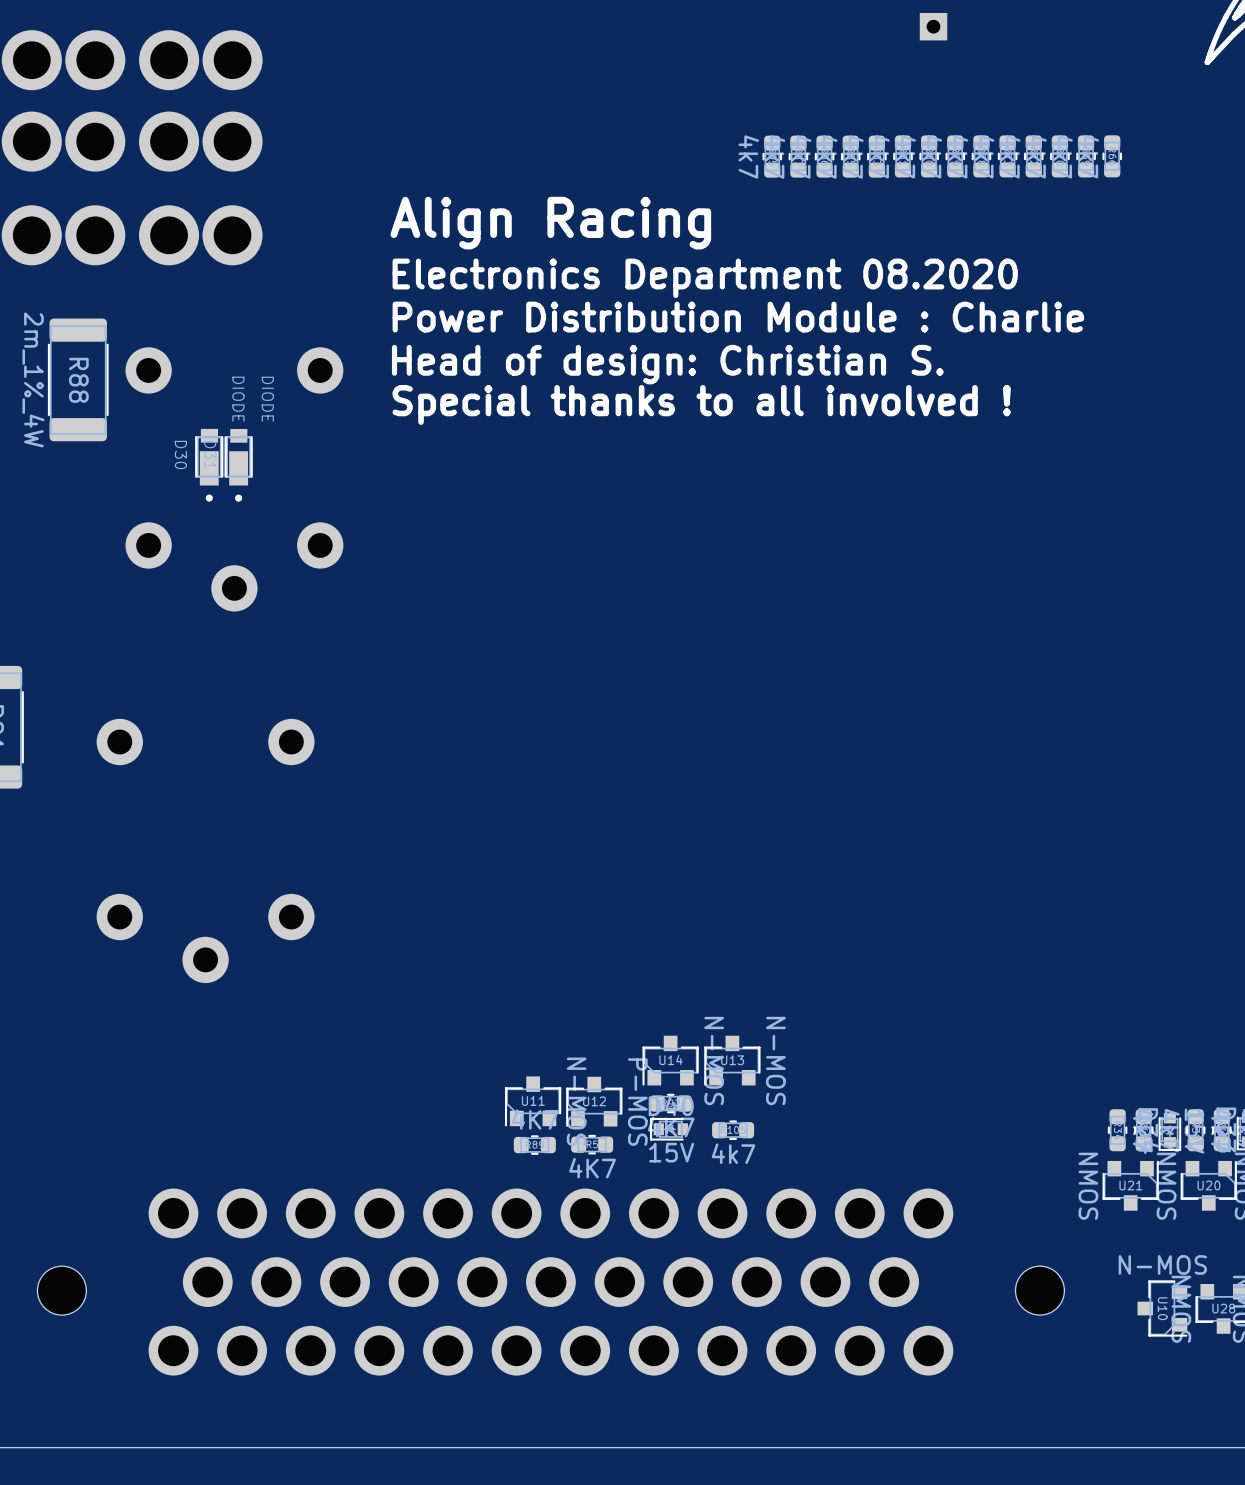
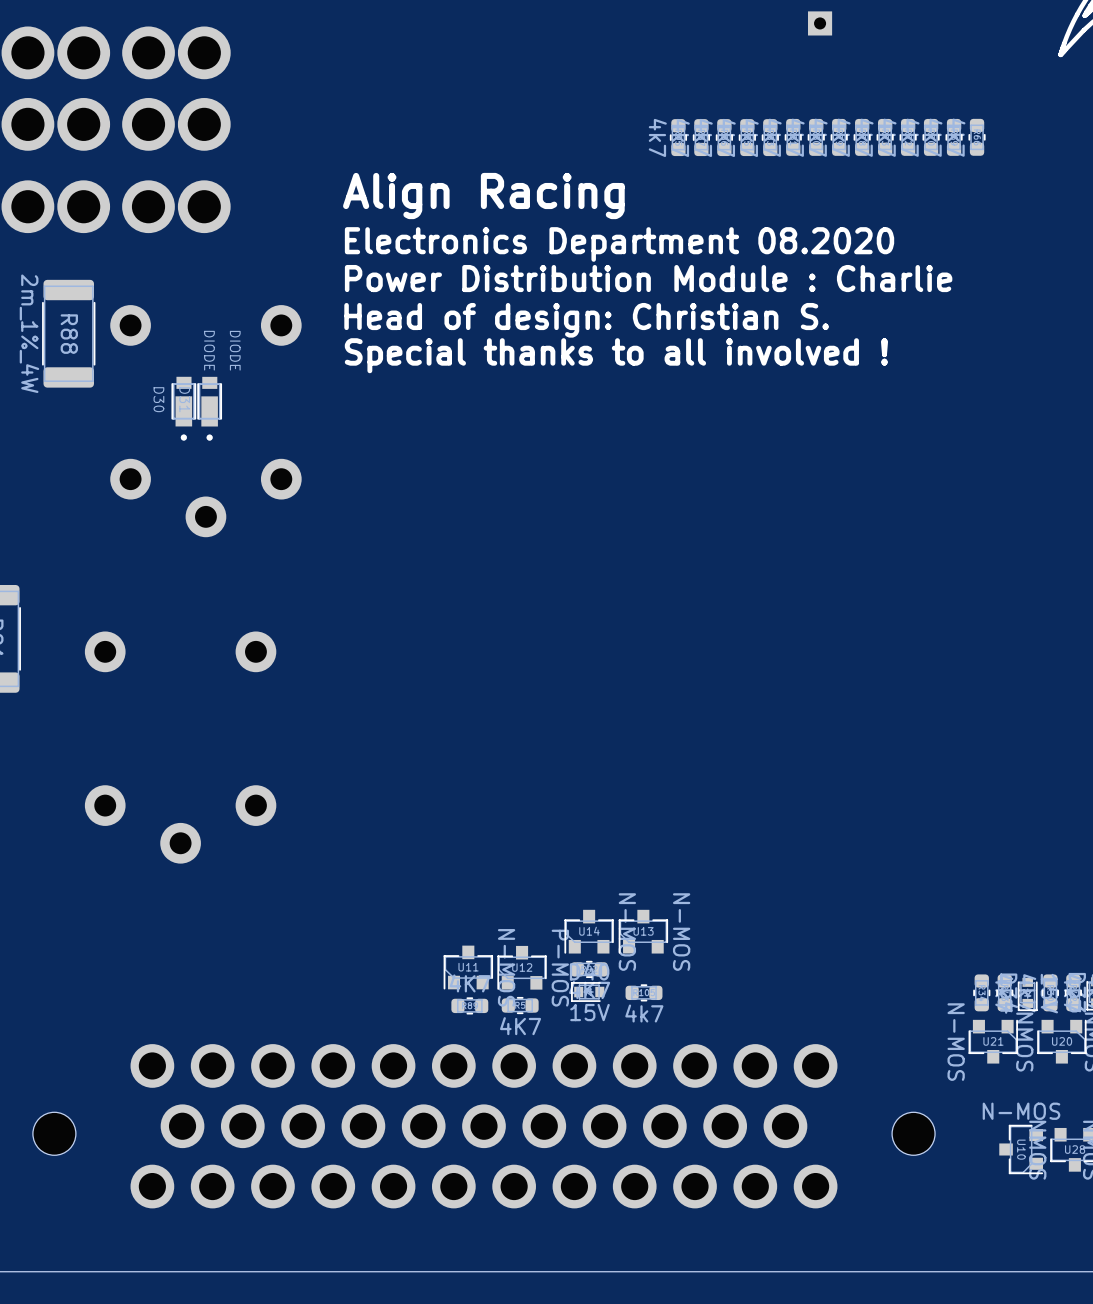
U21 value: NMOS (1088, 1186) -> N-MOS (956, 1042)

